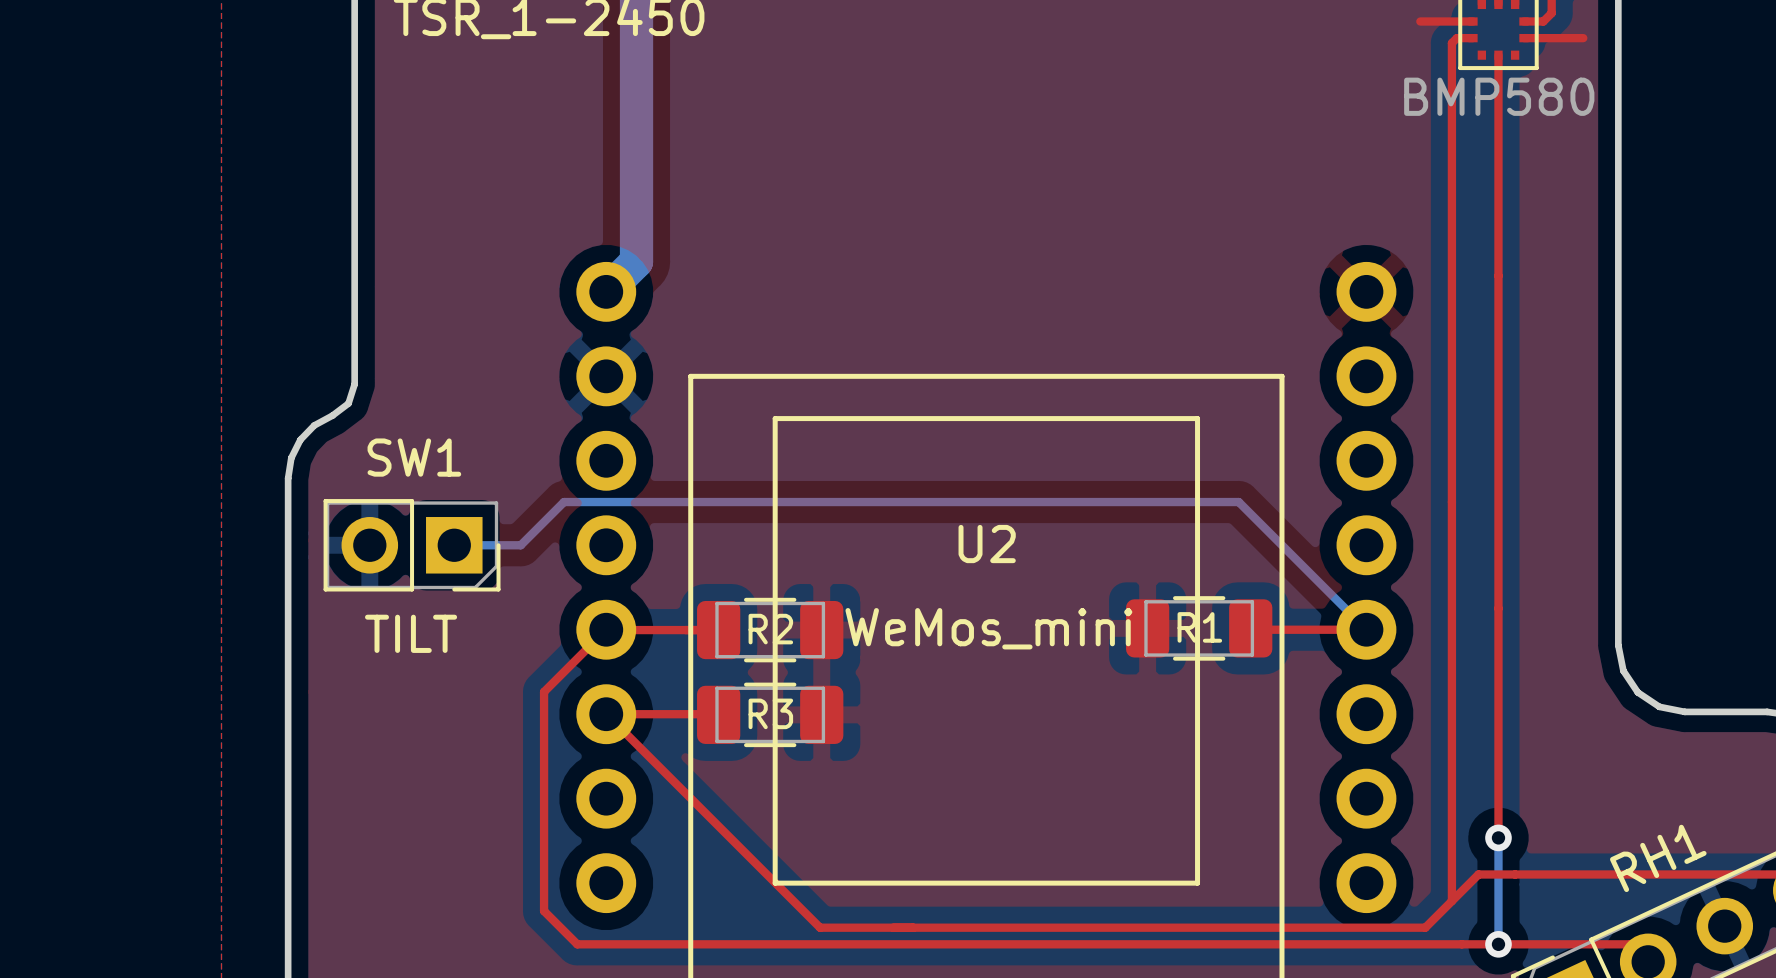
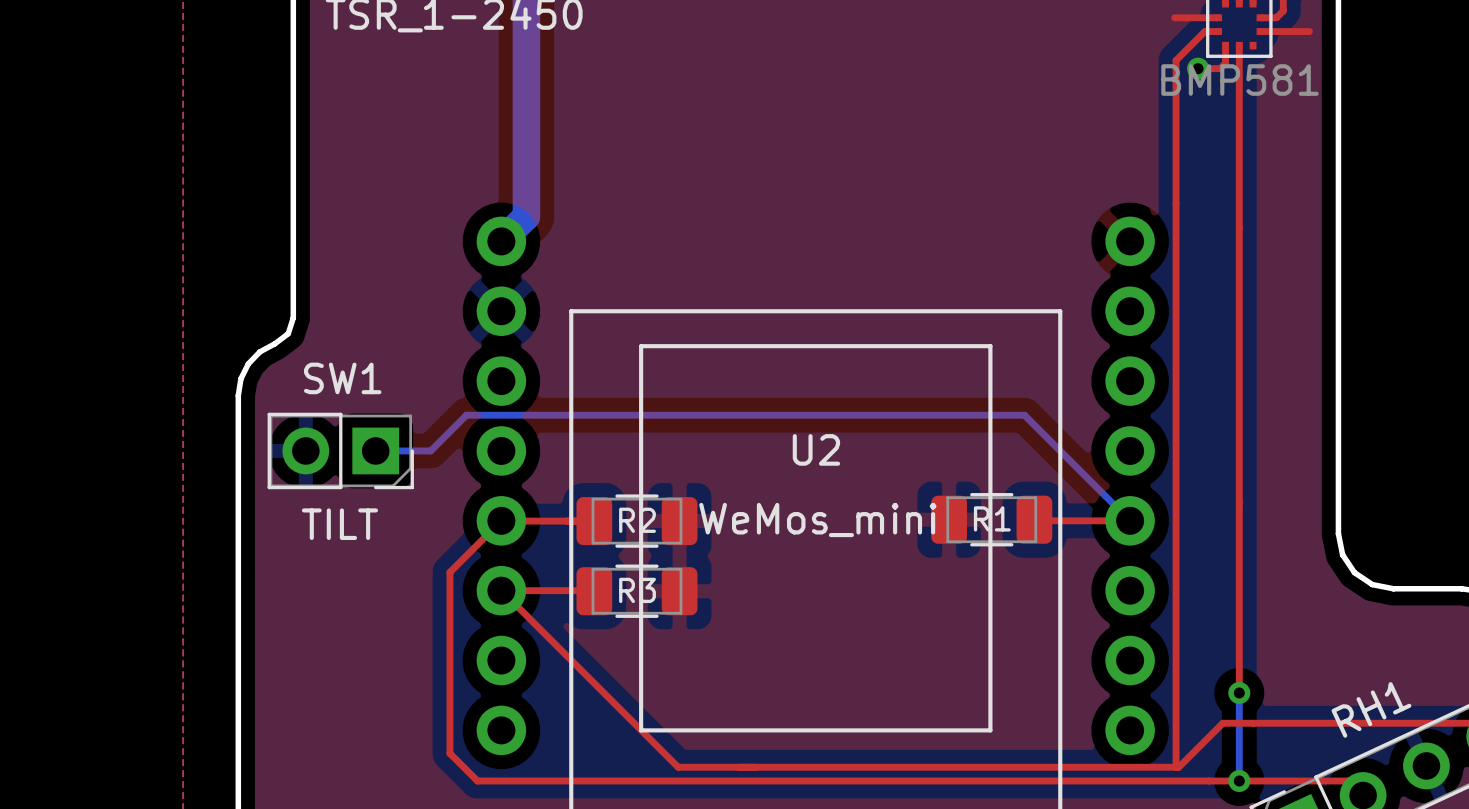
top track: (1451, 43) (1451, 901) -> (1200, 35) (1176, 60) (1176, 767)
top track: none -> (1225, 45) (1225, 63) (1220, 68) (1198, 68)
via: none -> (1198, 68)
part value: BMP580 (1499, 96) -> BMP581 (1239, 80)

